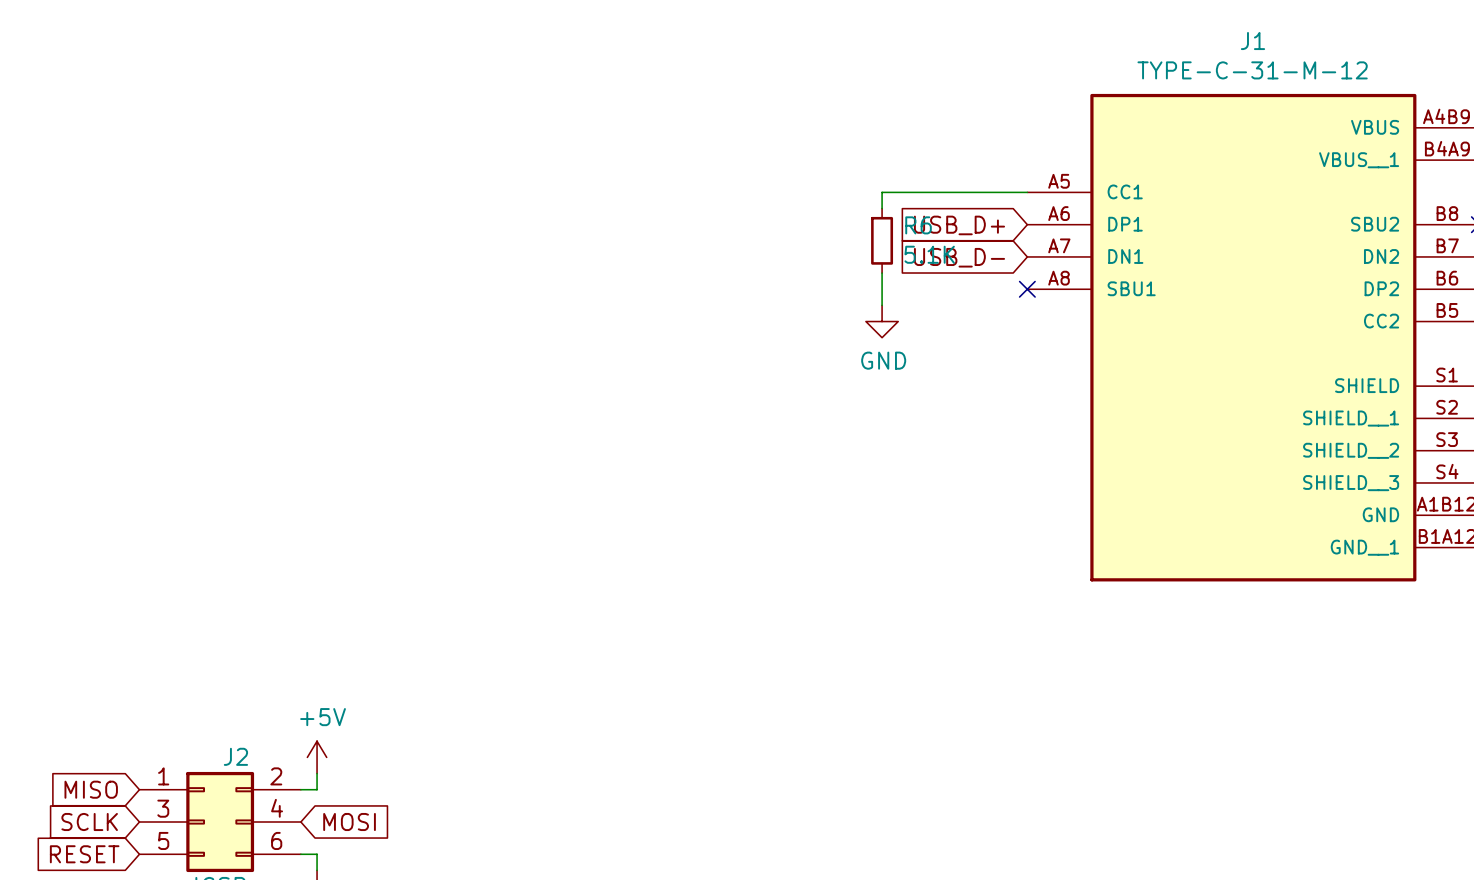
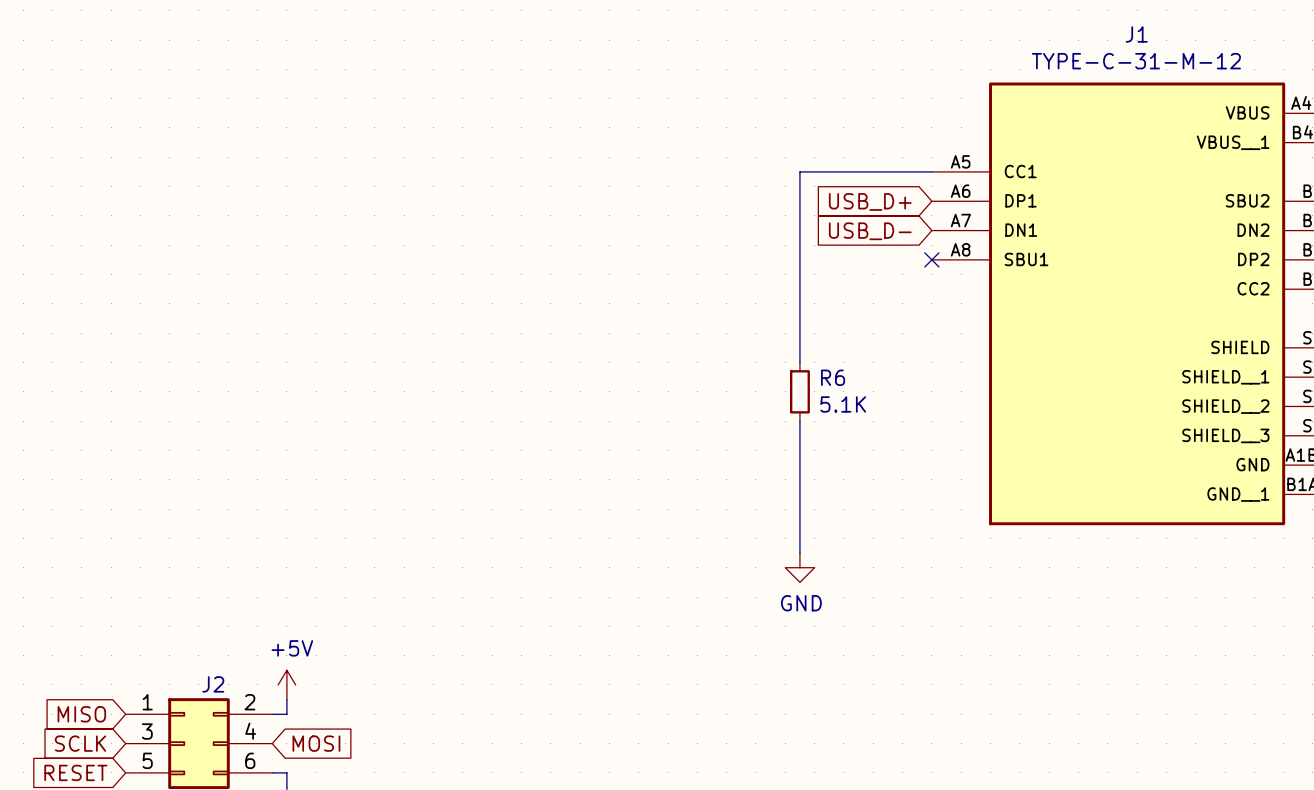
wire: none -> (799, 186) (799, 245)
R6 position: (882, 240) -> (799, 391)
wire: none -> (799, 274) (799, 362)
power symbol position: GND (882, 321) -> GND (799, 567)
wire: none -> (799, 421) (799, 553)

